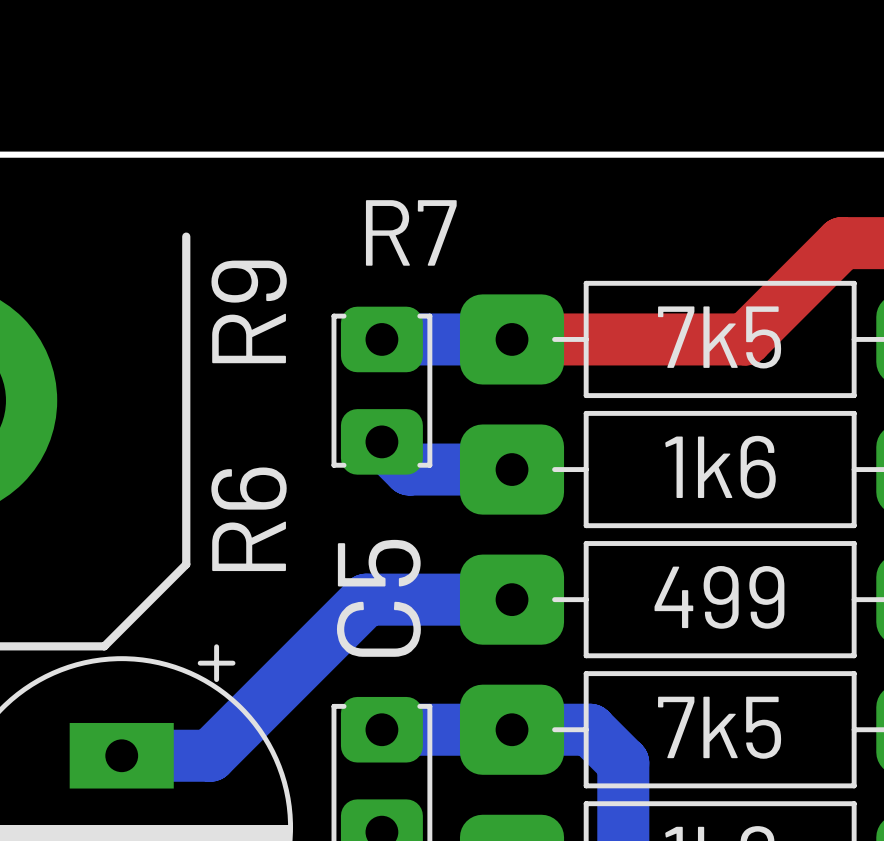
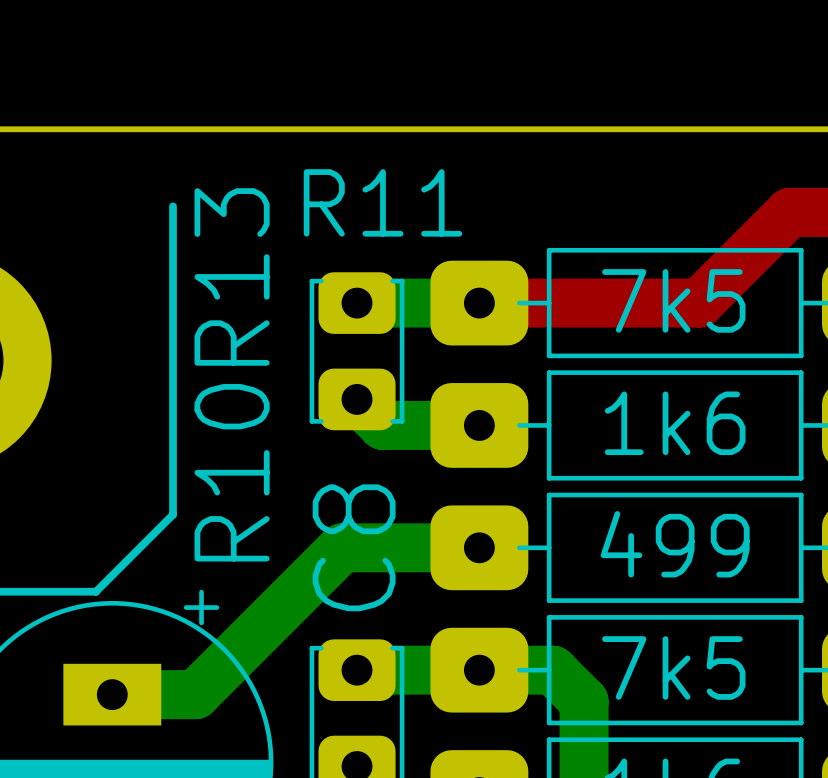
R7 name: R7 (411, 232) -> R11 (382, 202)
R9 name: R9 (249, 311) -> R13 (232, 276)
R6 name: R6 (249, 519) -> R10 (232, 472)
C5 name: C5 (378, 598) -> C8 (354, 547)

